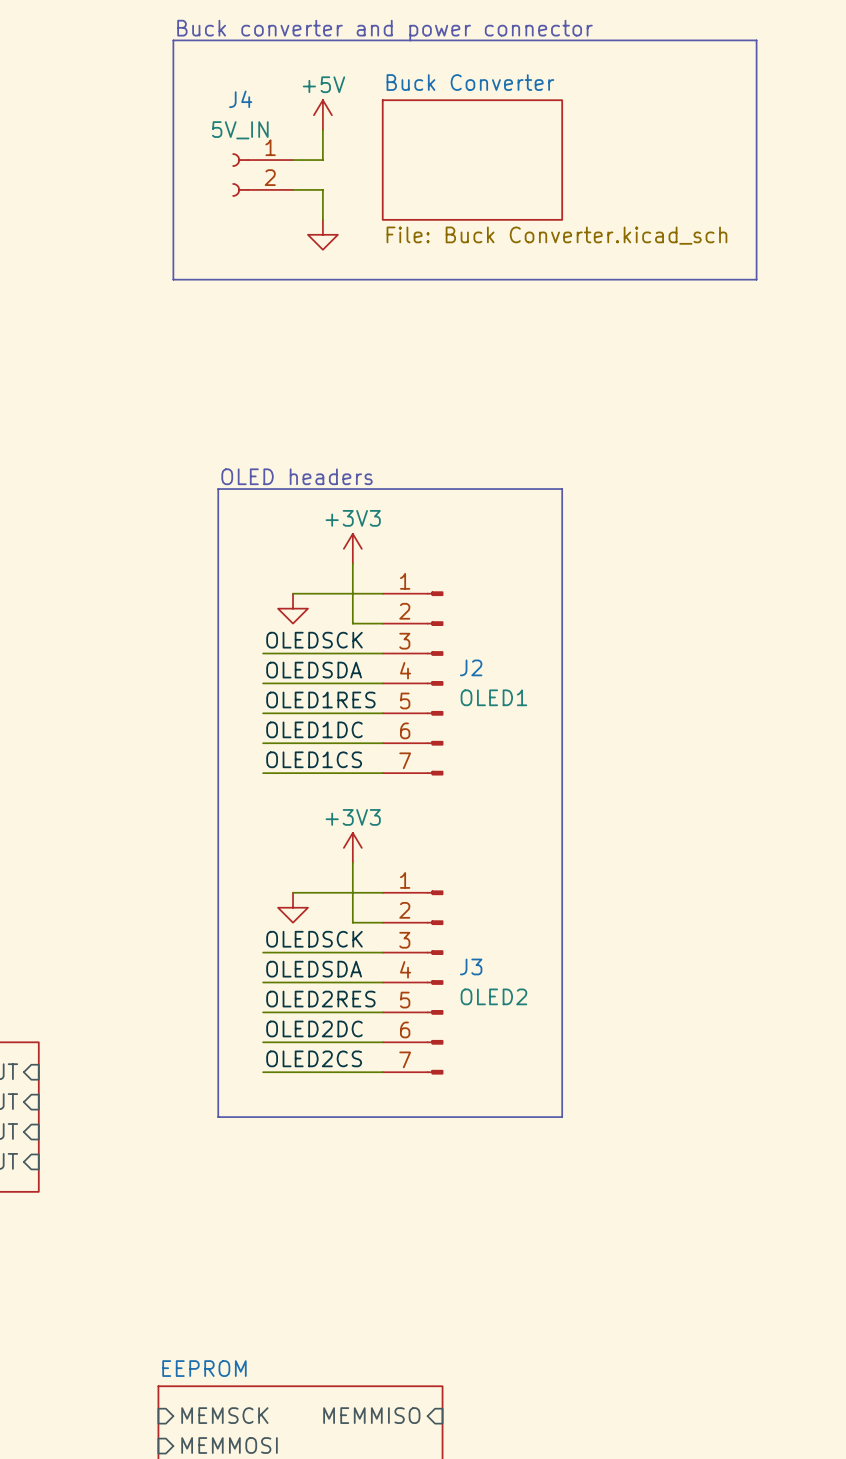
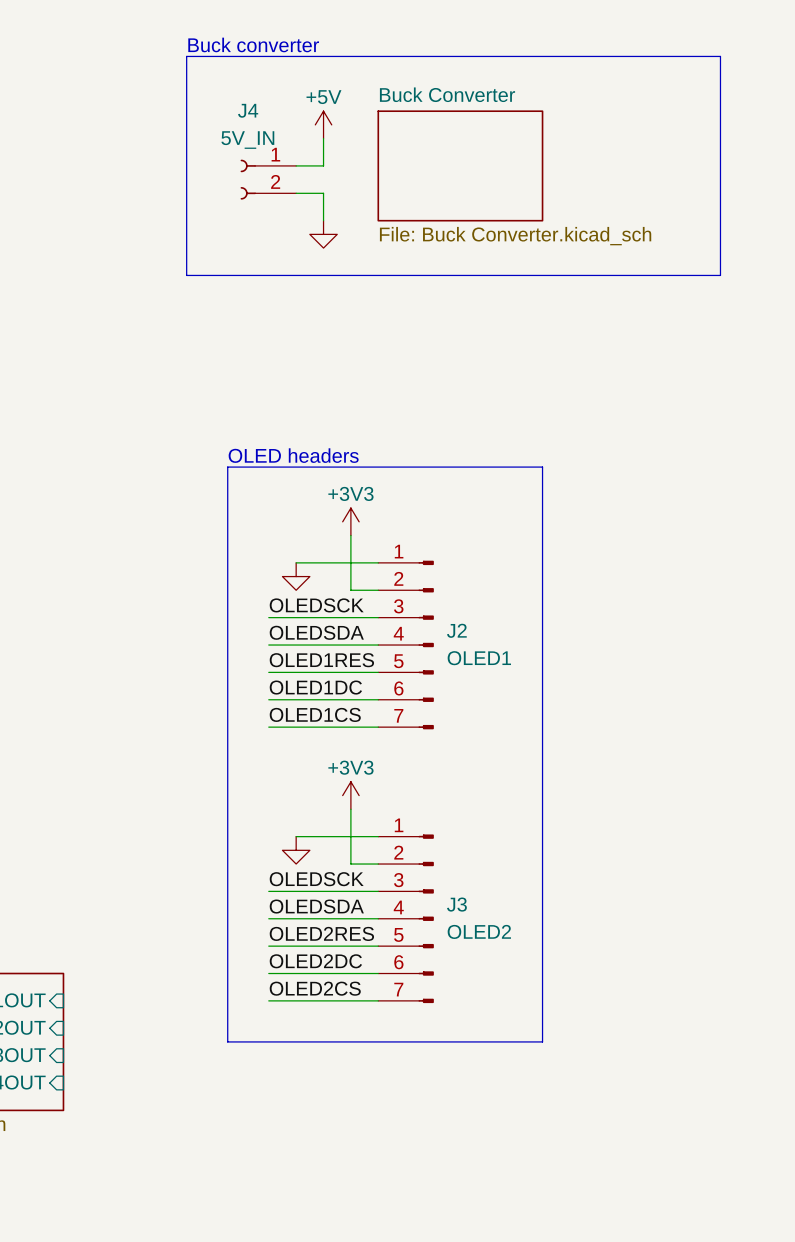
text: Buck converter and power connector (384, 30) -> Buck converter (253, 44)

